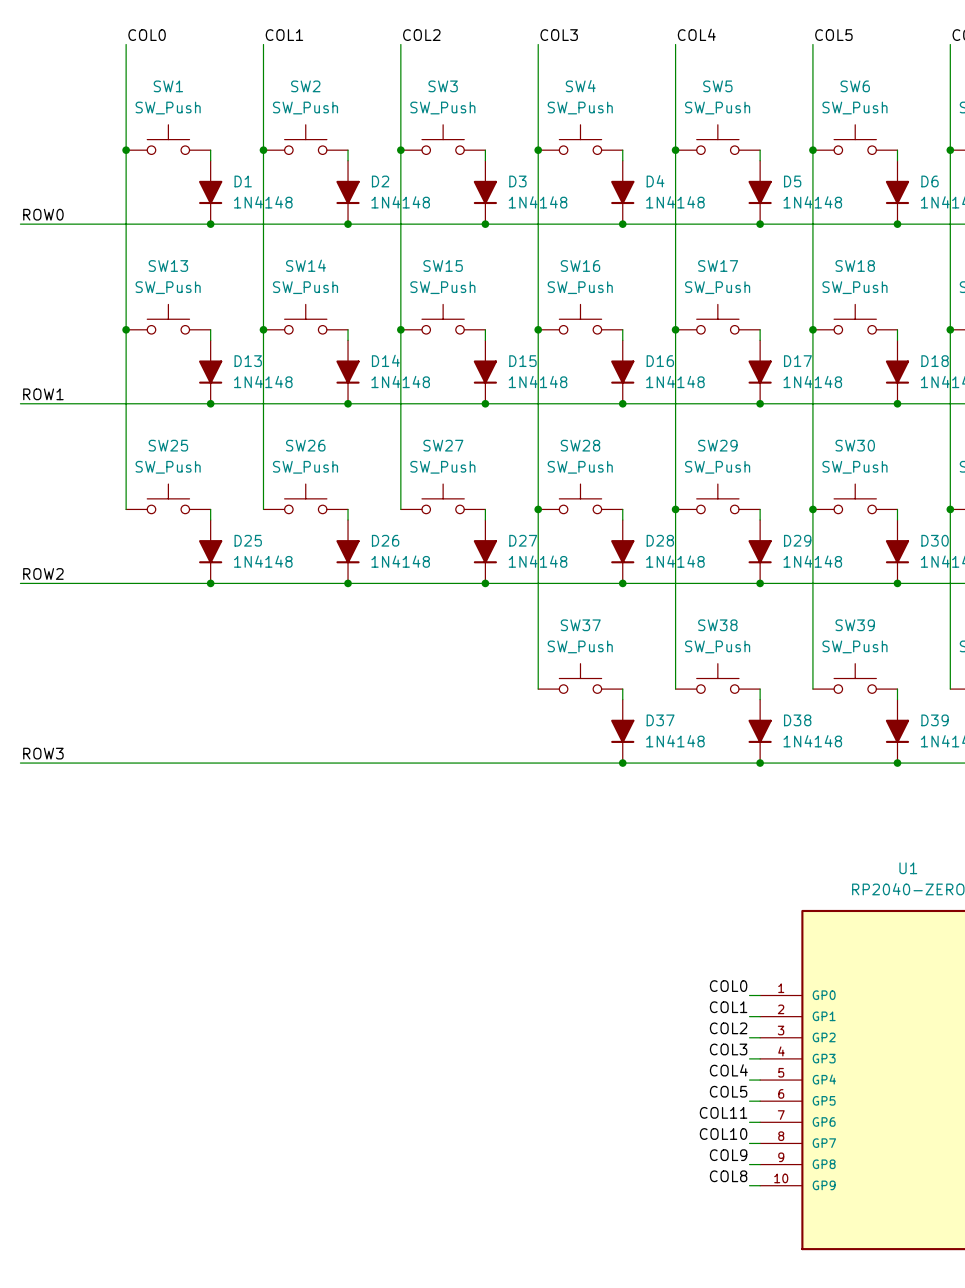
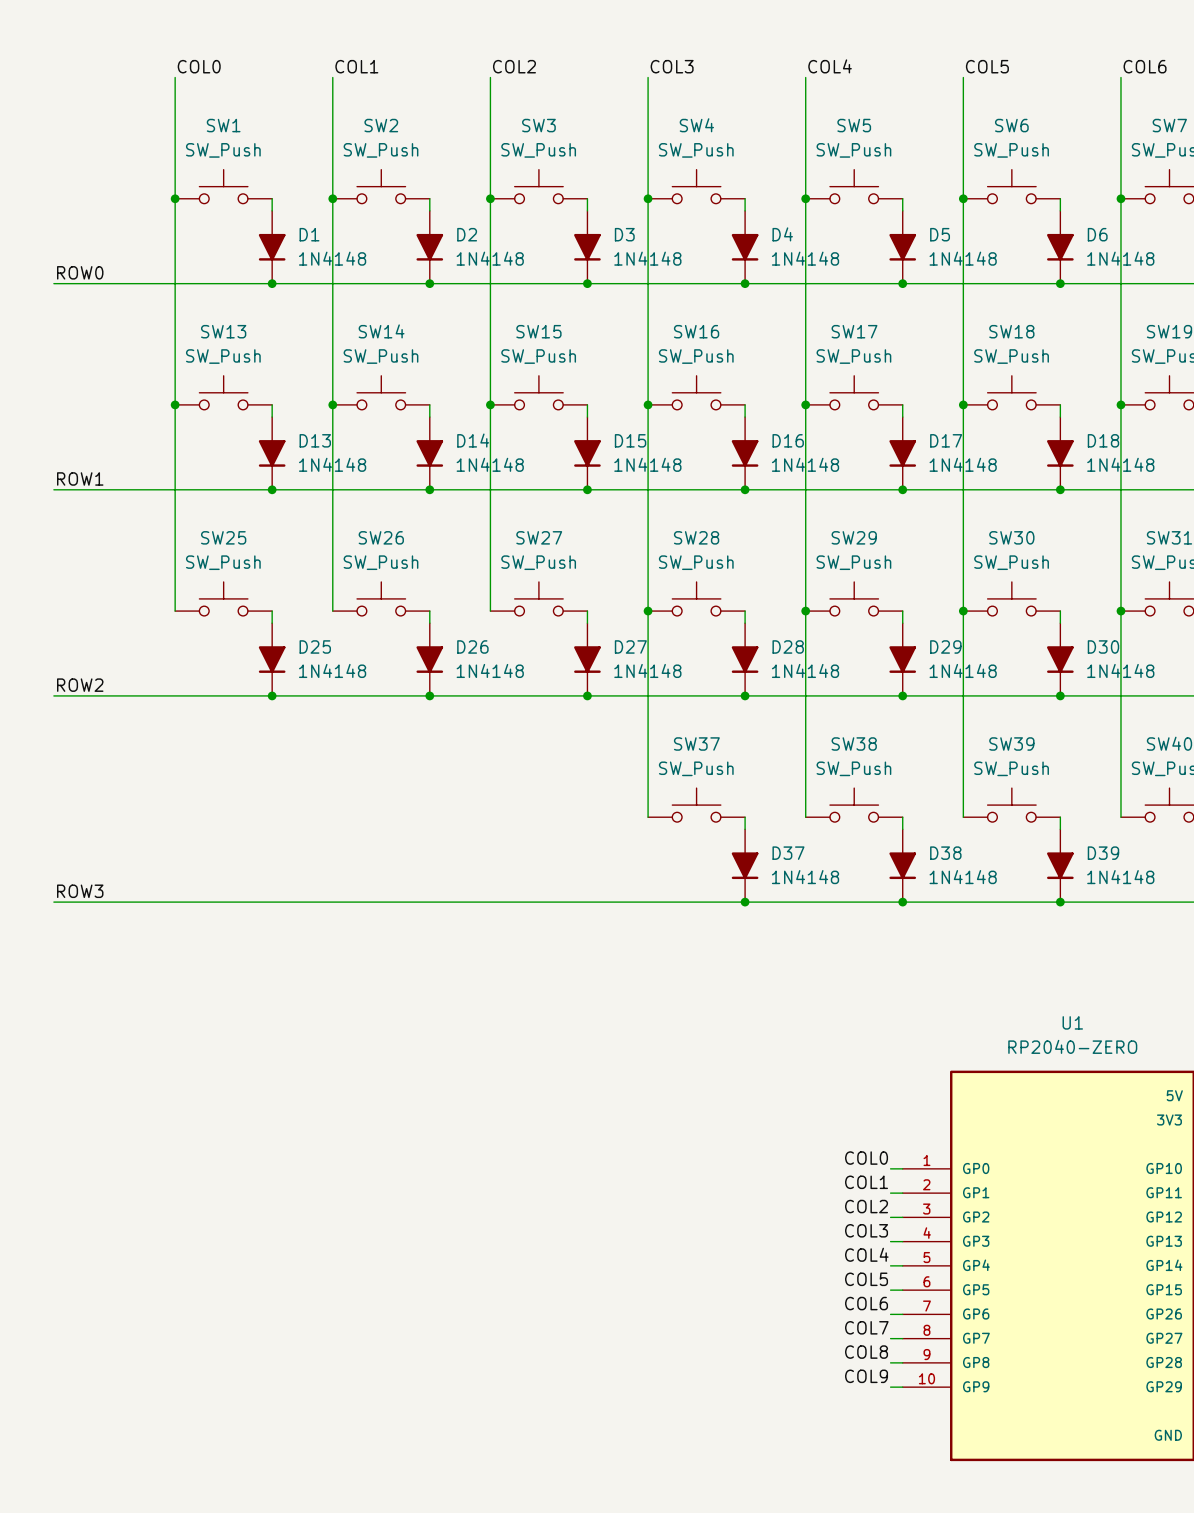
label: COL11 (723, 1112) -> COL6 (866, 1303)
label: COL10 (723, 1134) -> COL7 (866, 1327)
label: COL9 (728, 1155) -> COL8 (866, 1352)
label: COL8 (728, 1176) -> COL9 (866, 1376)

